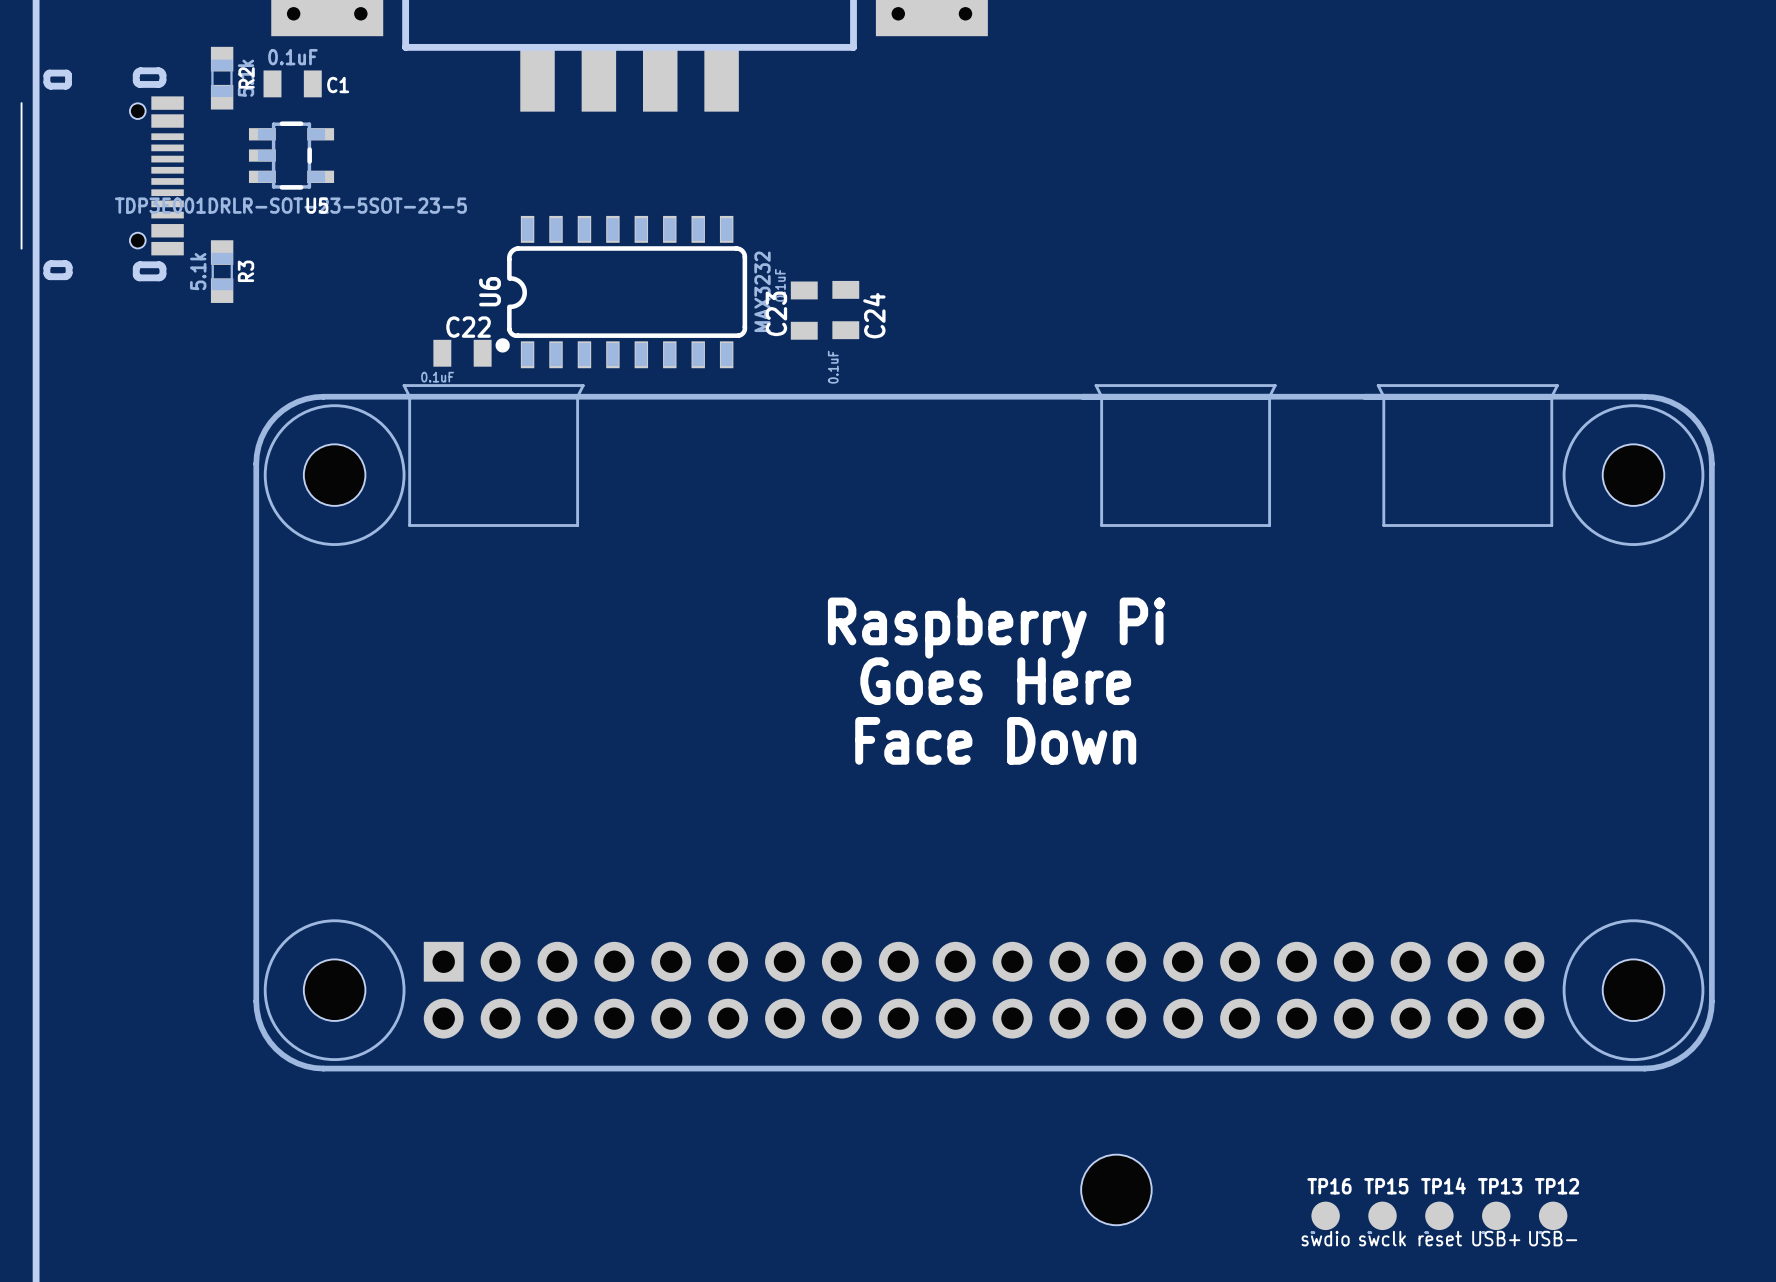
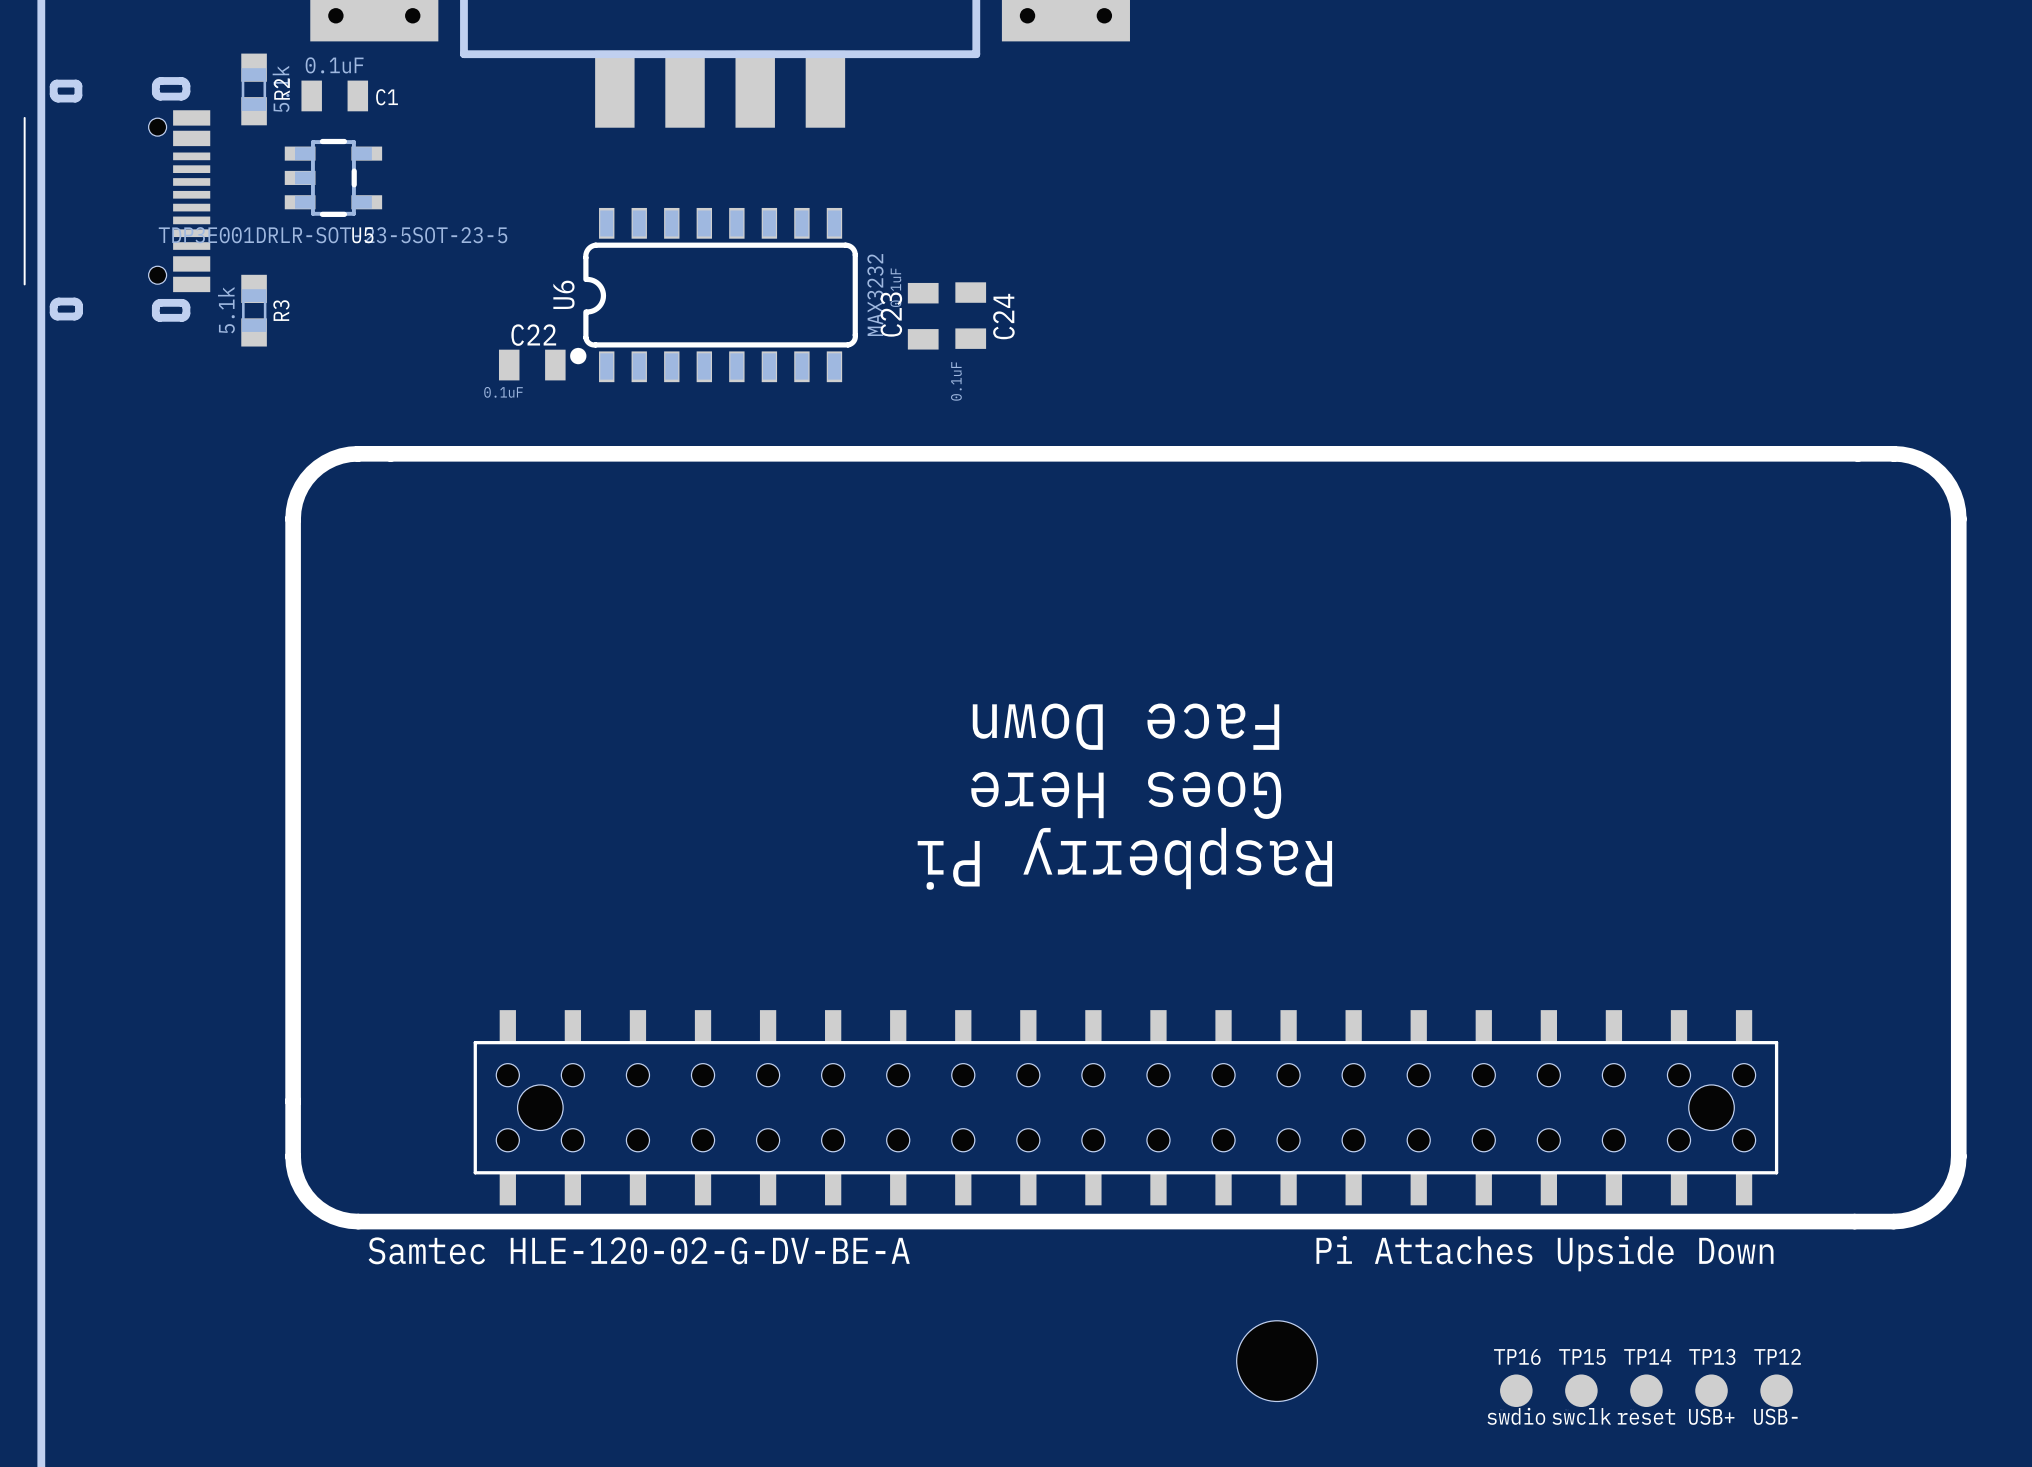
U6 position: (621, 292) -> (714, 295)
C23 position: (804, 310) -> (923, 316)
C24 position: (845, 310) -> (970, 315)
C22 position: (462, 353) -> (532, 365)
line: none -> (1893, 453) (358, 453) (333, 458) (318, 467) (306, 479) (295, 502) (293, 518) (293, 1156) (298, 1181) (306, 1196) (318, 1208) (341, 1219) (358, 1221) (1893, 1221) (1918, 1216) (1933, 1208) (1945, 1196) (1956, 1173) (1958, 1156) (1958, 518) (1953, 493) (1939, 472) (1918, 458) (1893, 453)
text rotation: 0° (996, 628) -> 180° (1124, 858)
text rotation: 0° (995, 681) -> 180° (1126, 795)
part: (984, 727) -> none
text rotation: 0° (995, 740) -> 180° (1126, 726)
part: none -> (1125, 1107)

